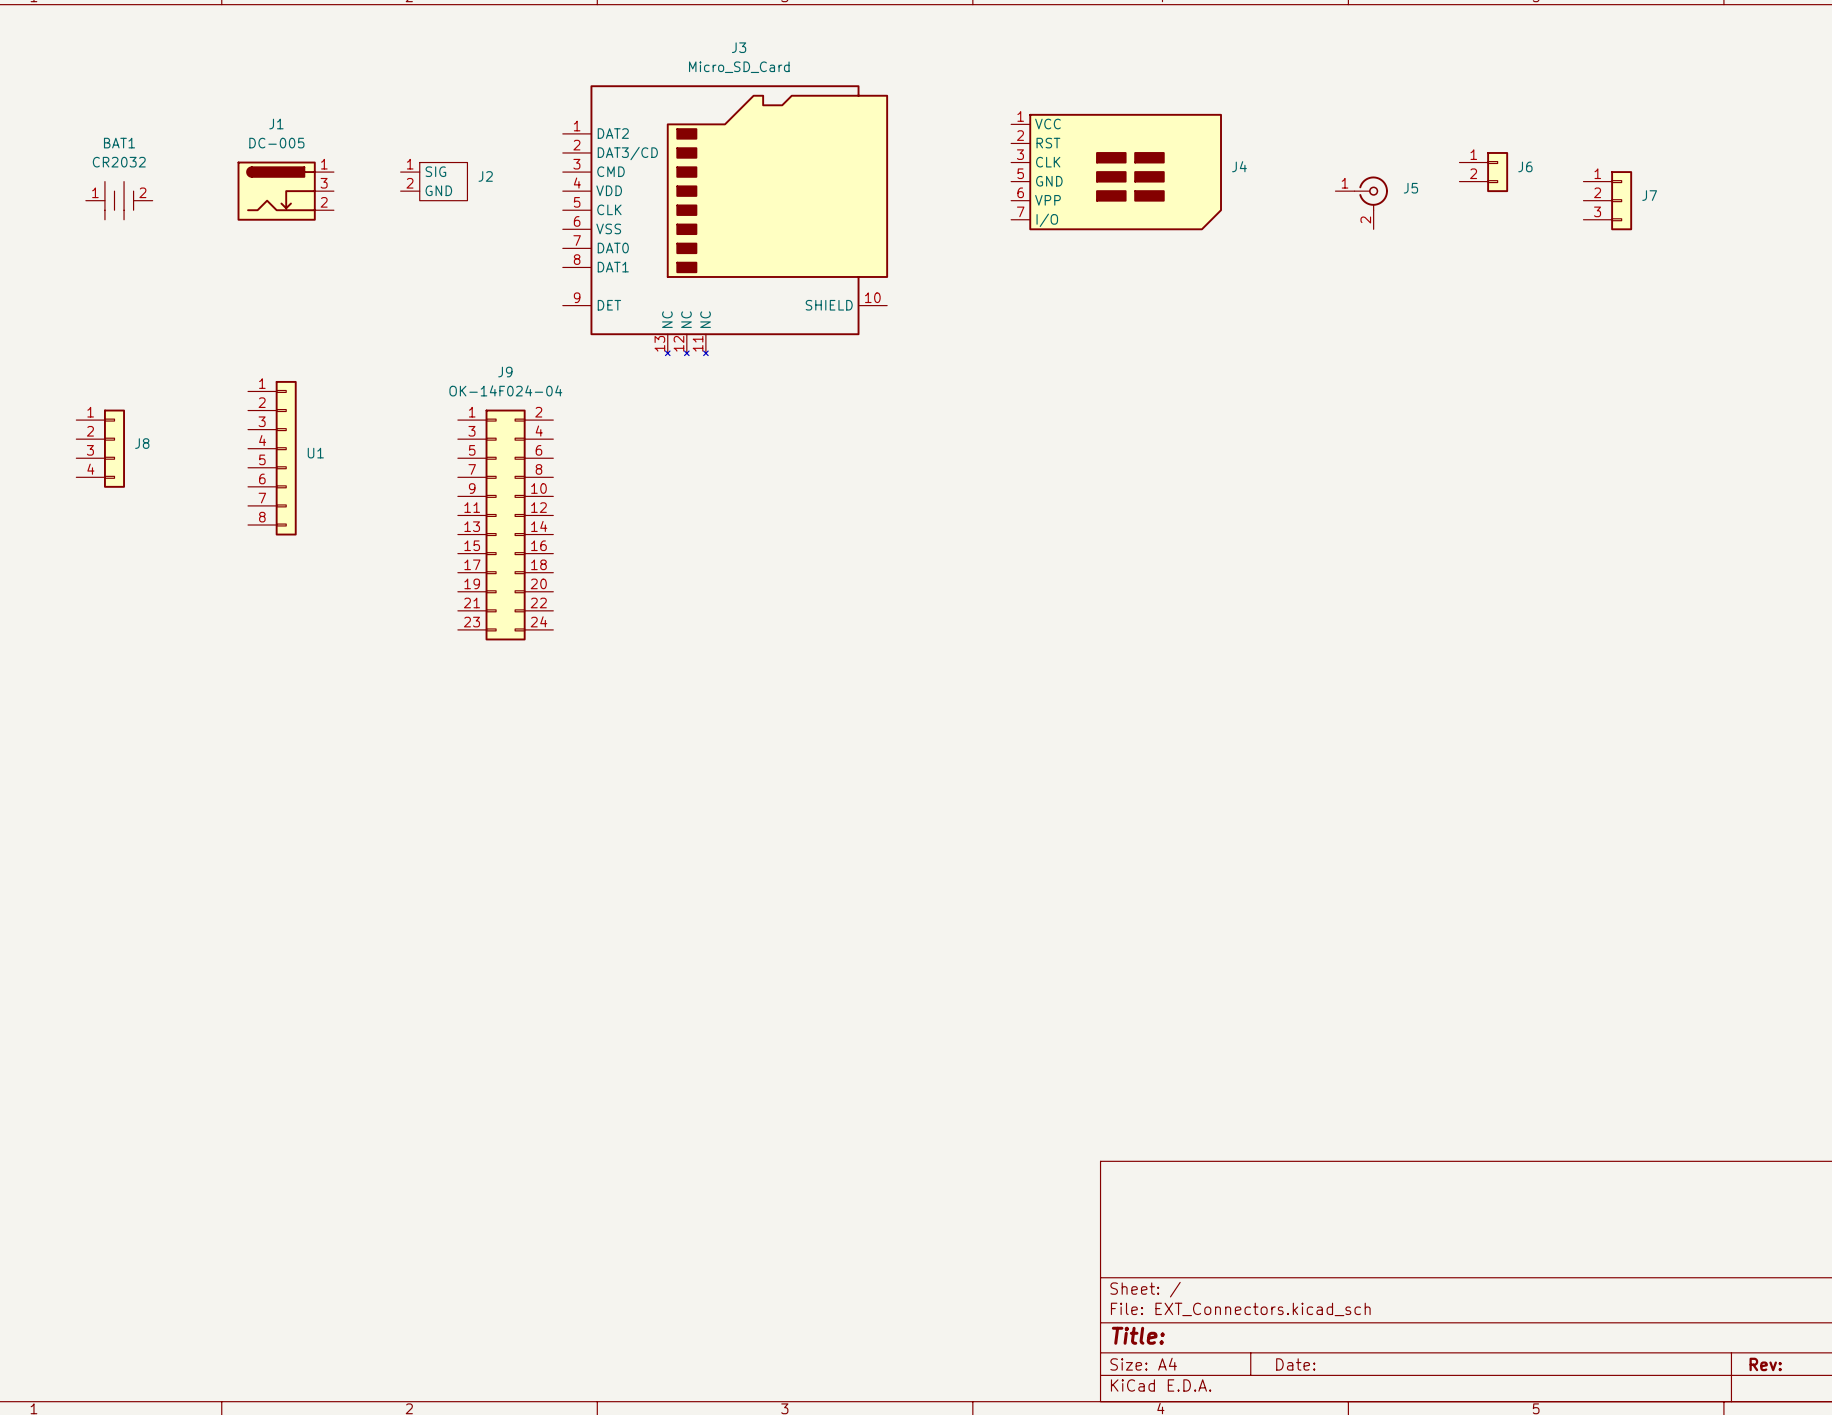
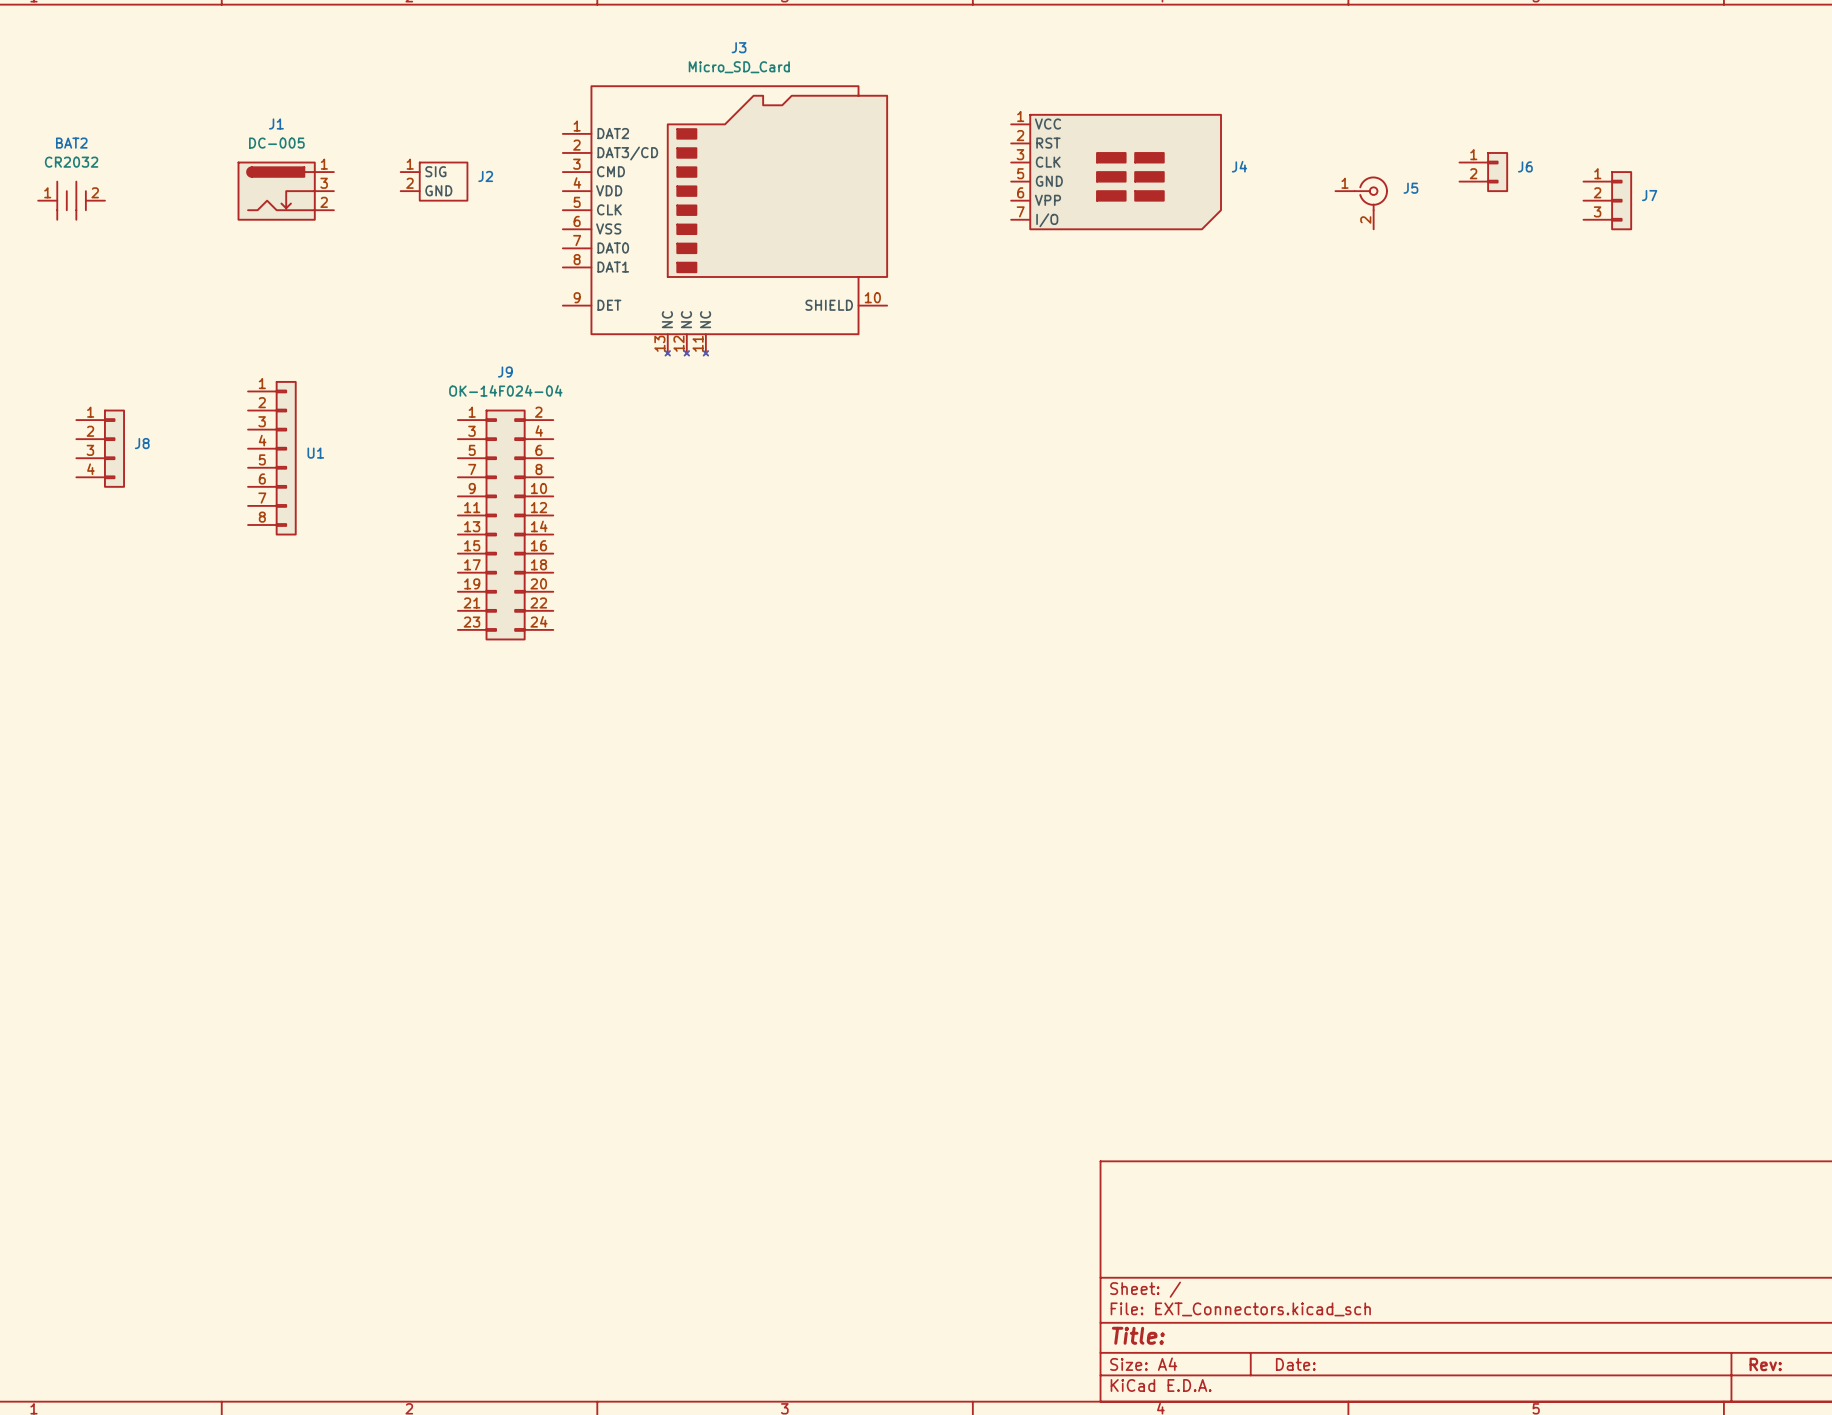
BAT2: none -> CR2032 (71, 200)
BAT1: CR2032 (119, 200) -> none

